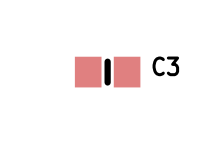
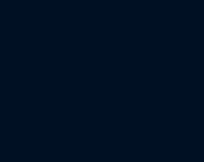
C3: (107, 72) -> none

